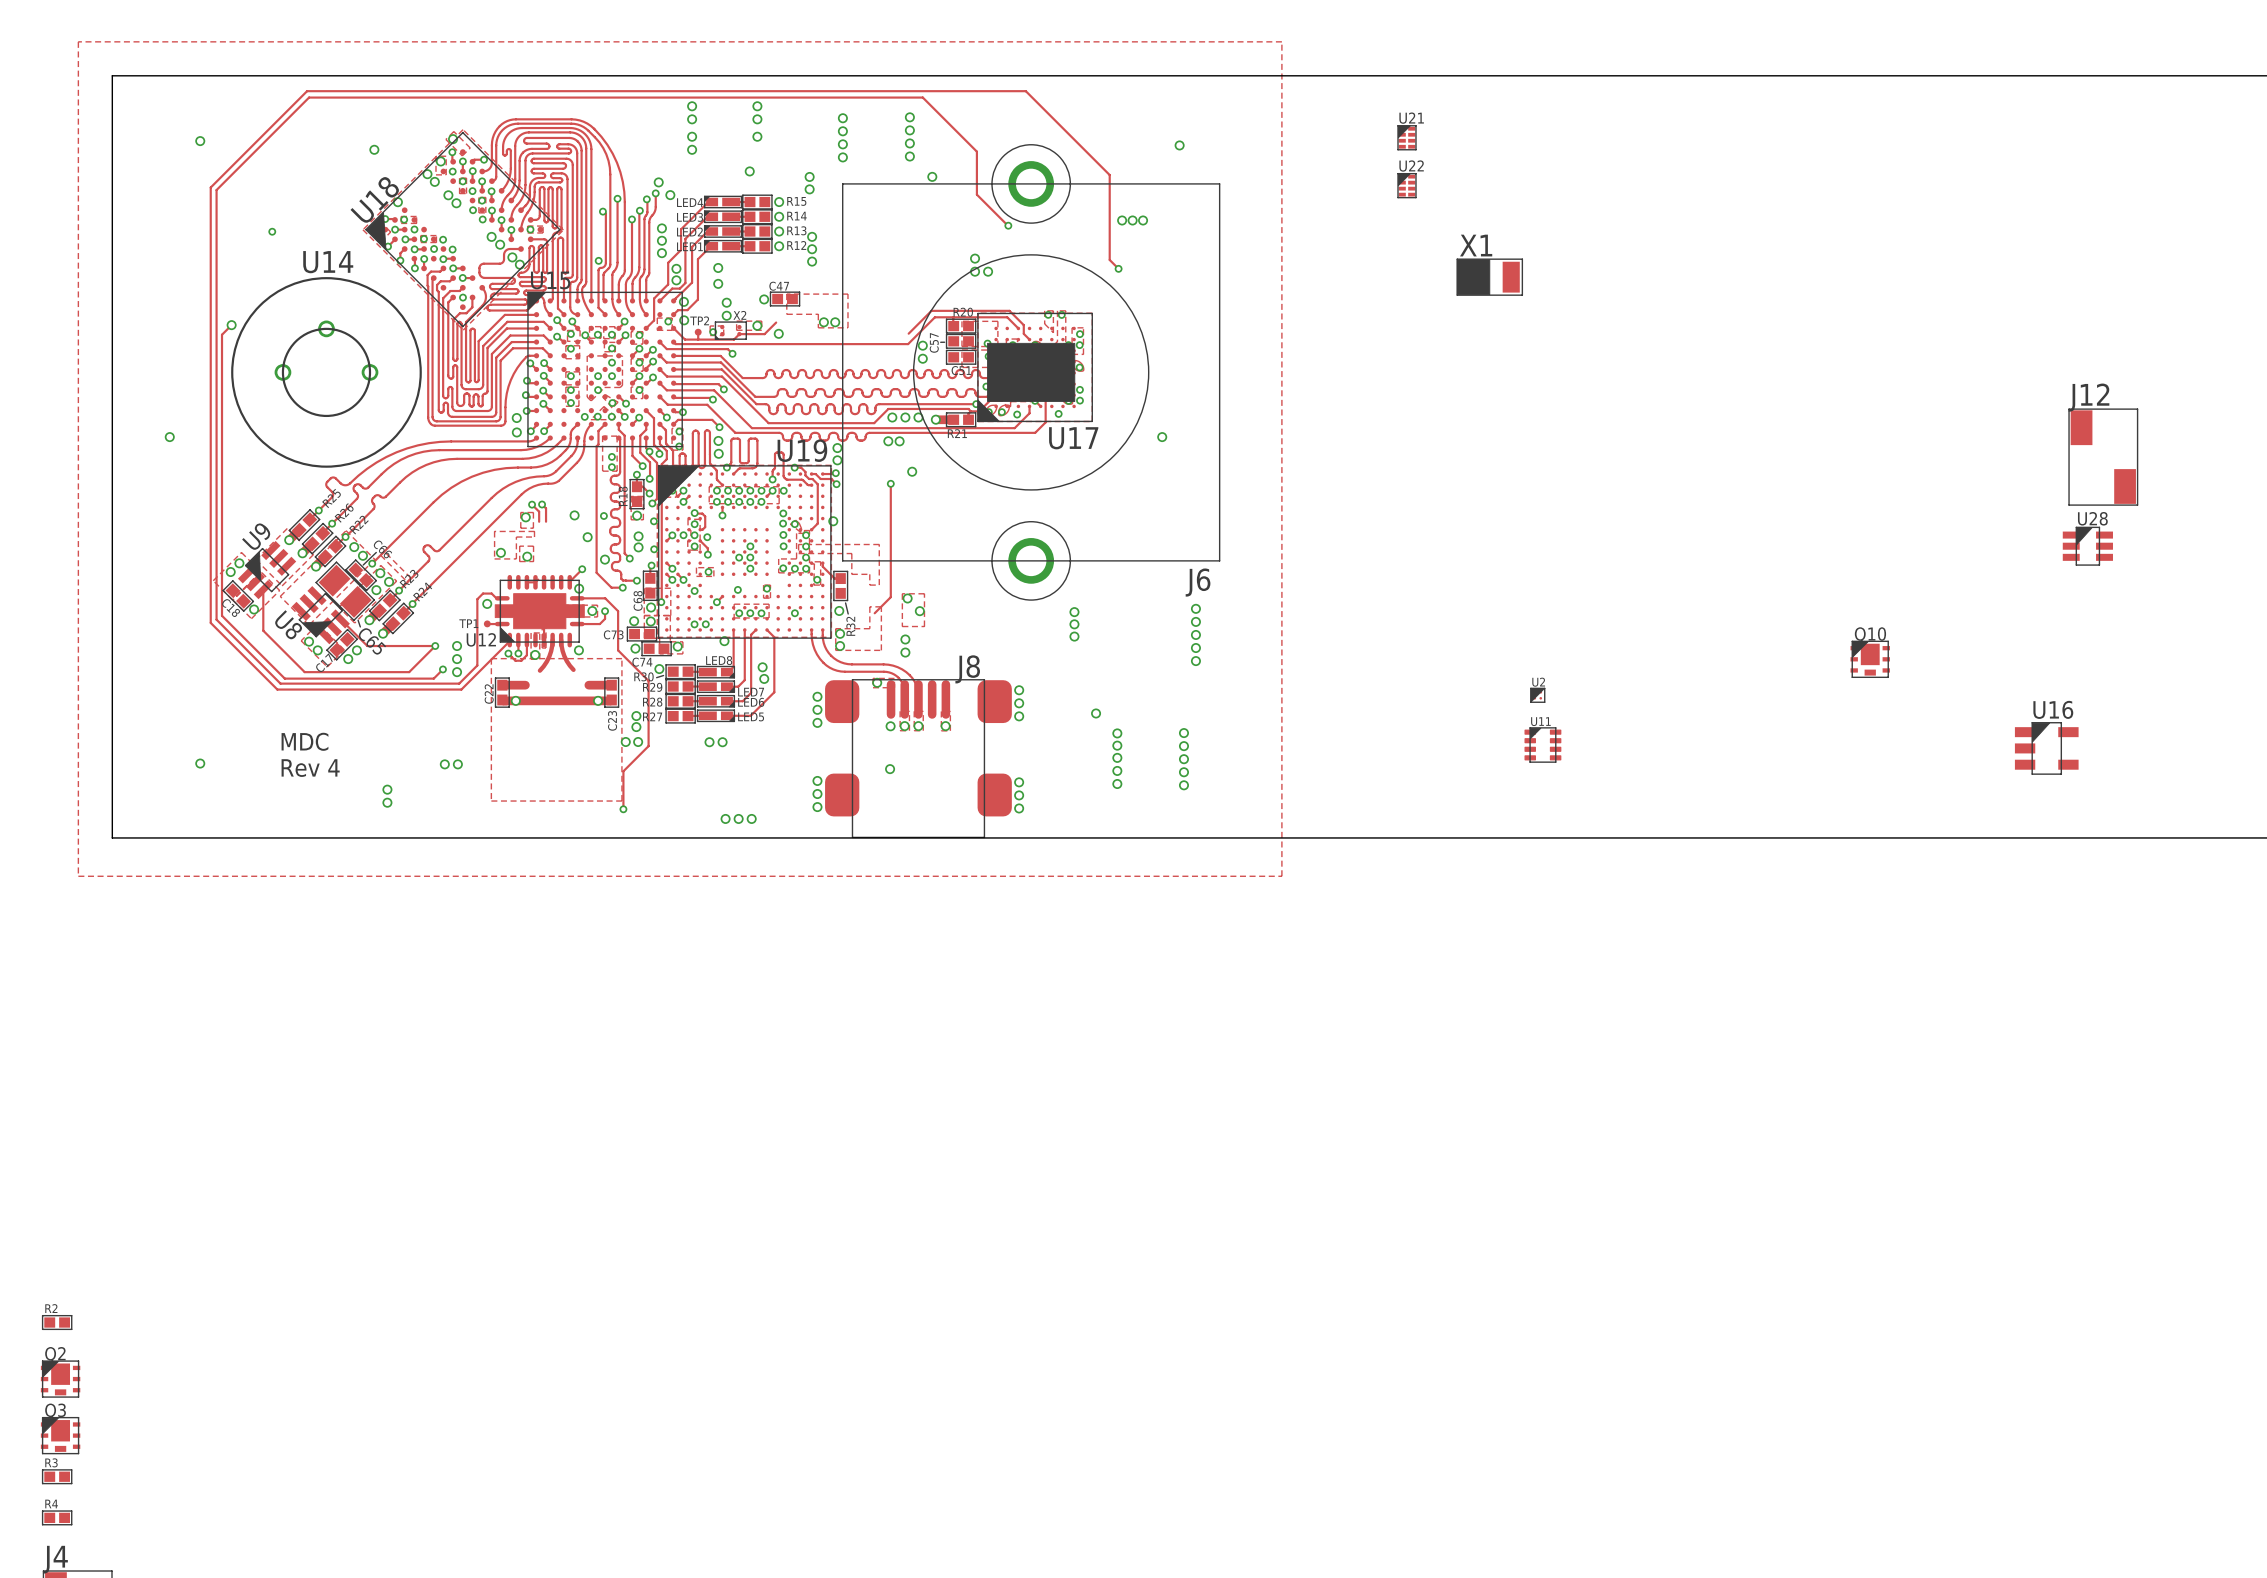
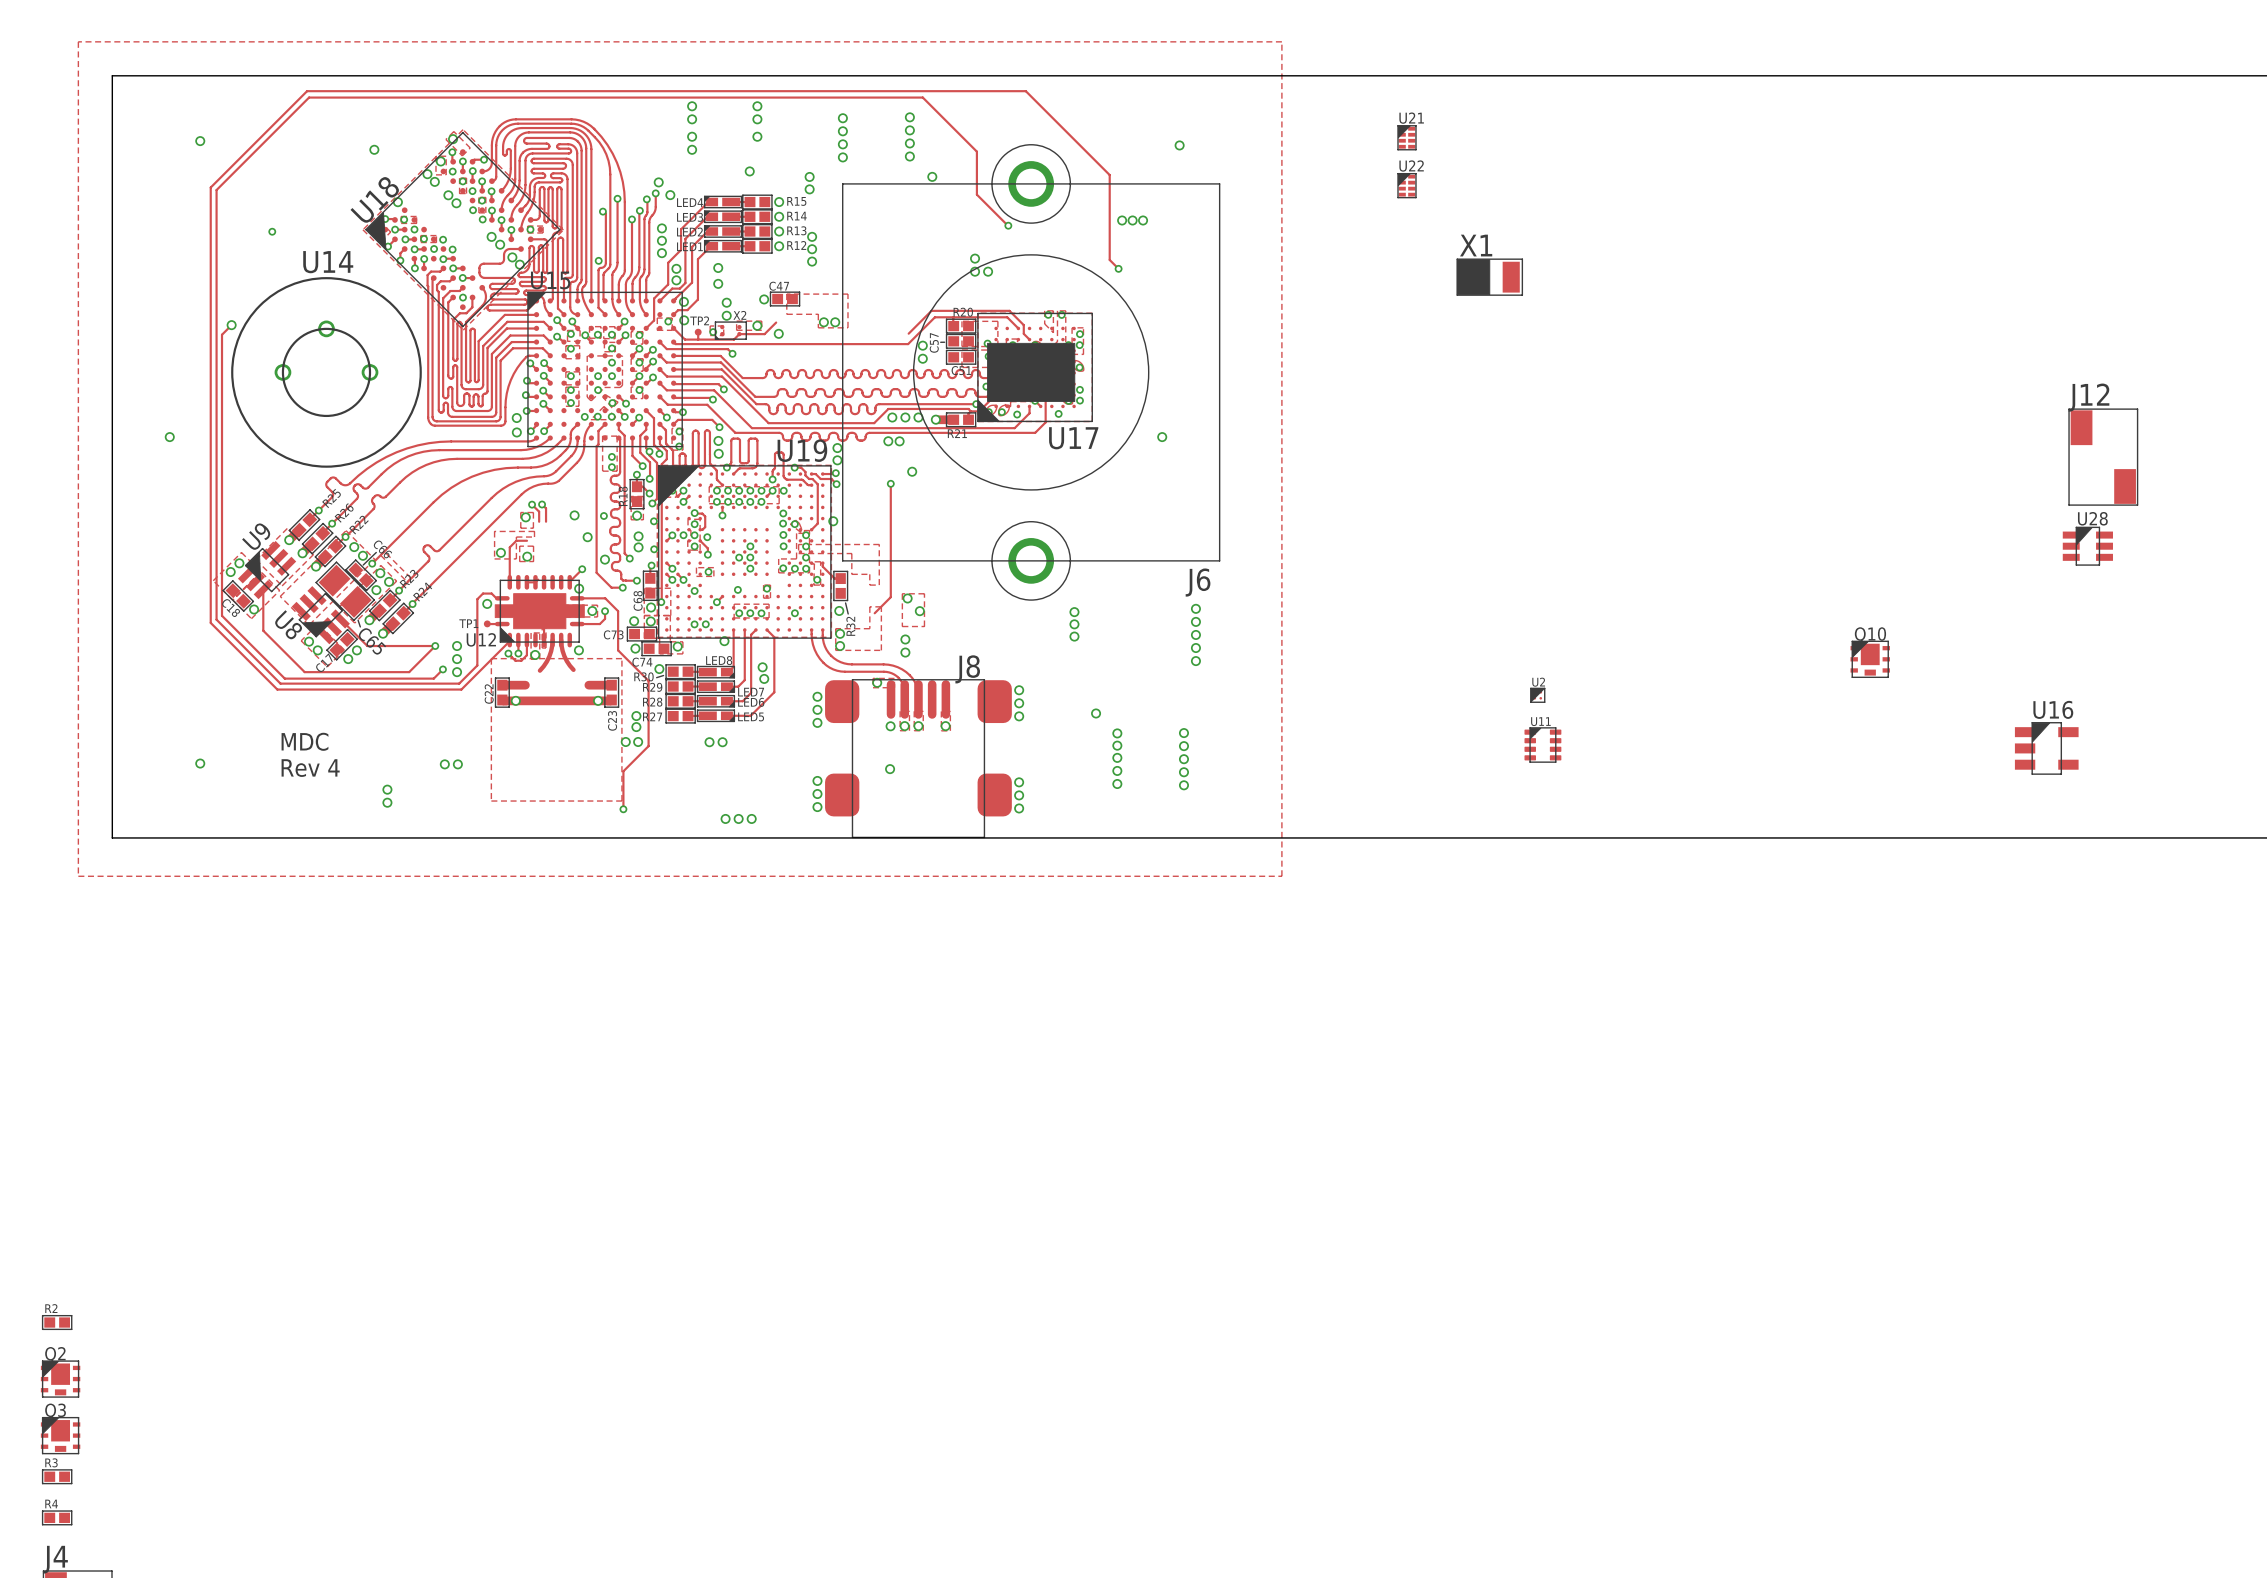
track: none -> (526, 540) (516, 540) (509, 547) (509, 582)

